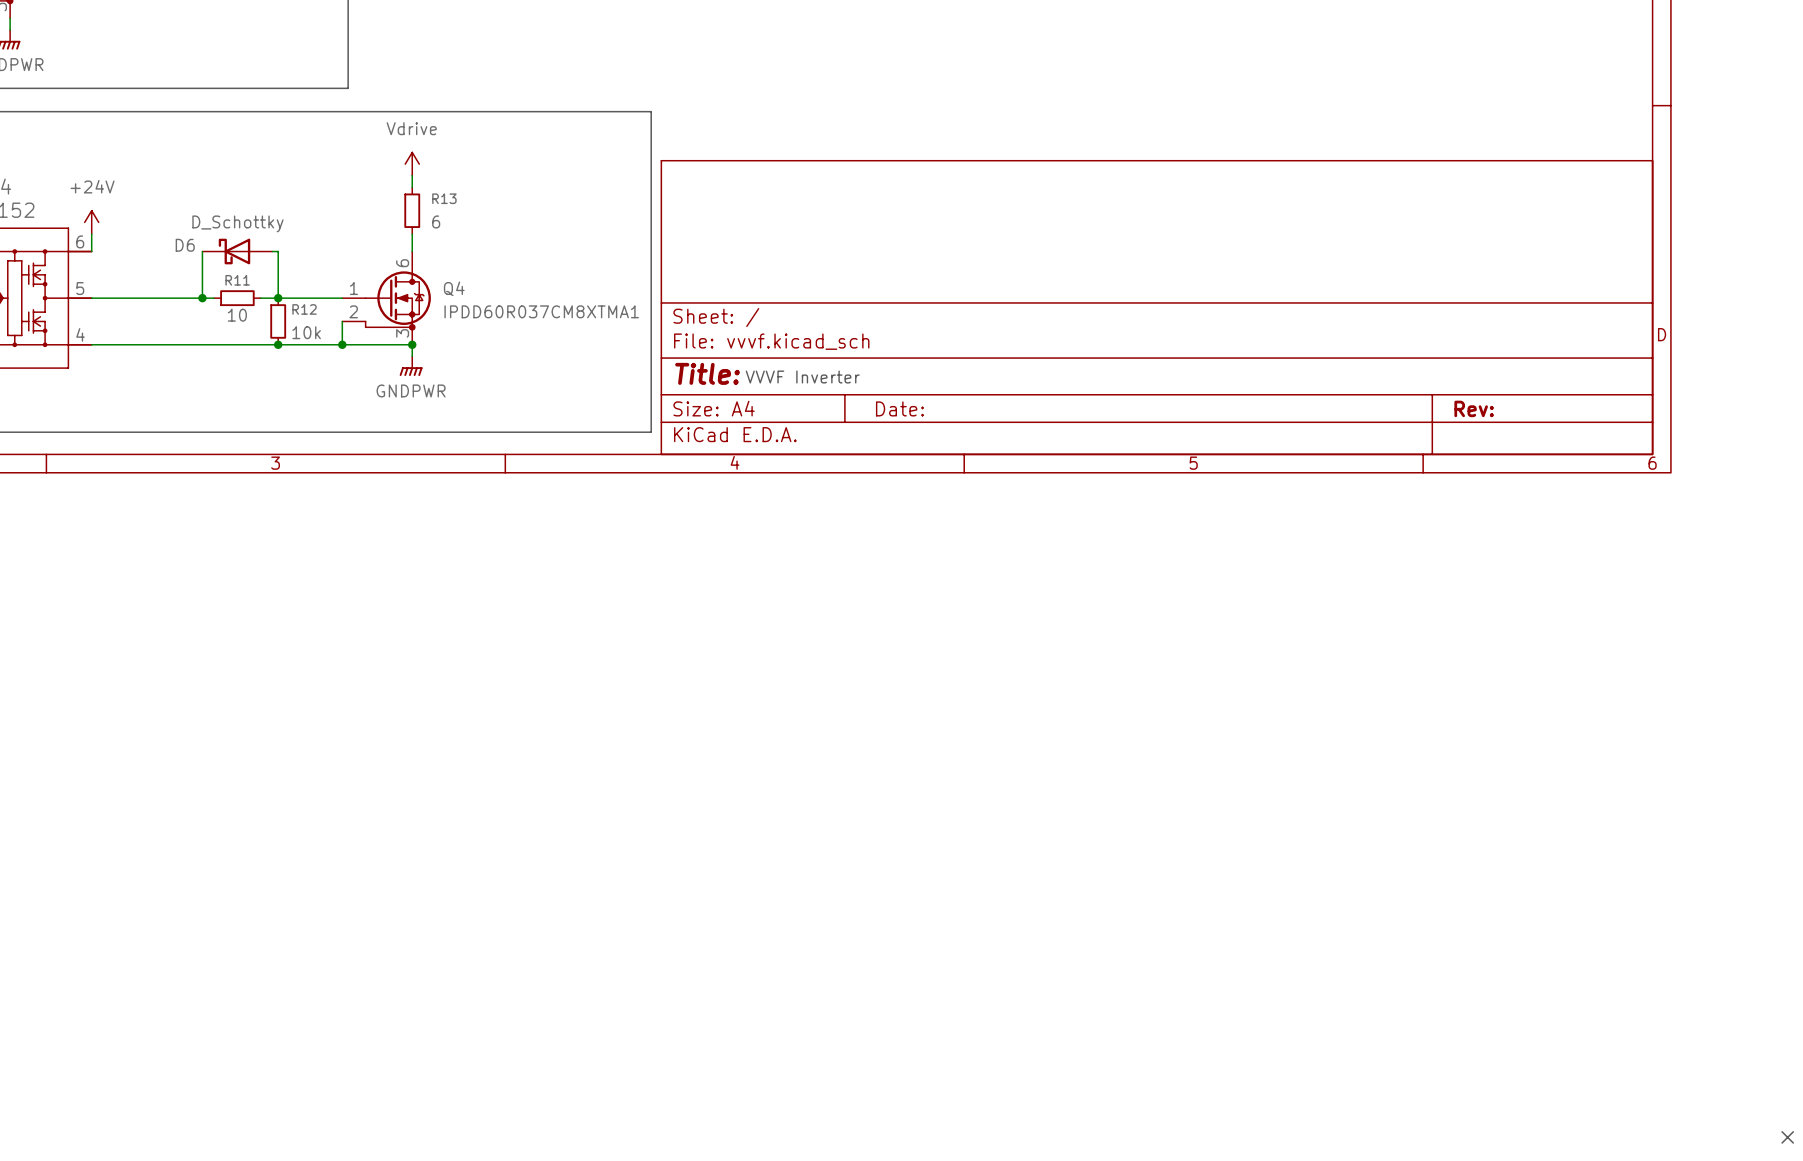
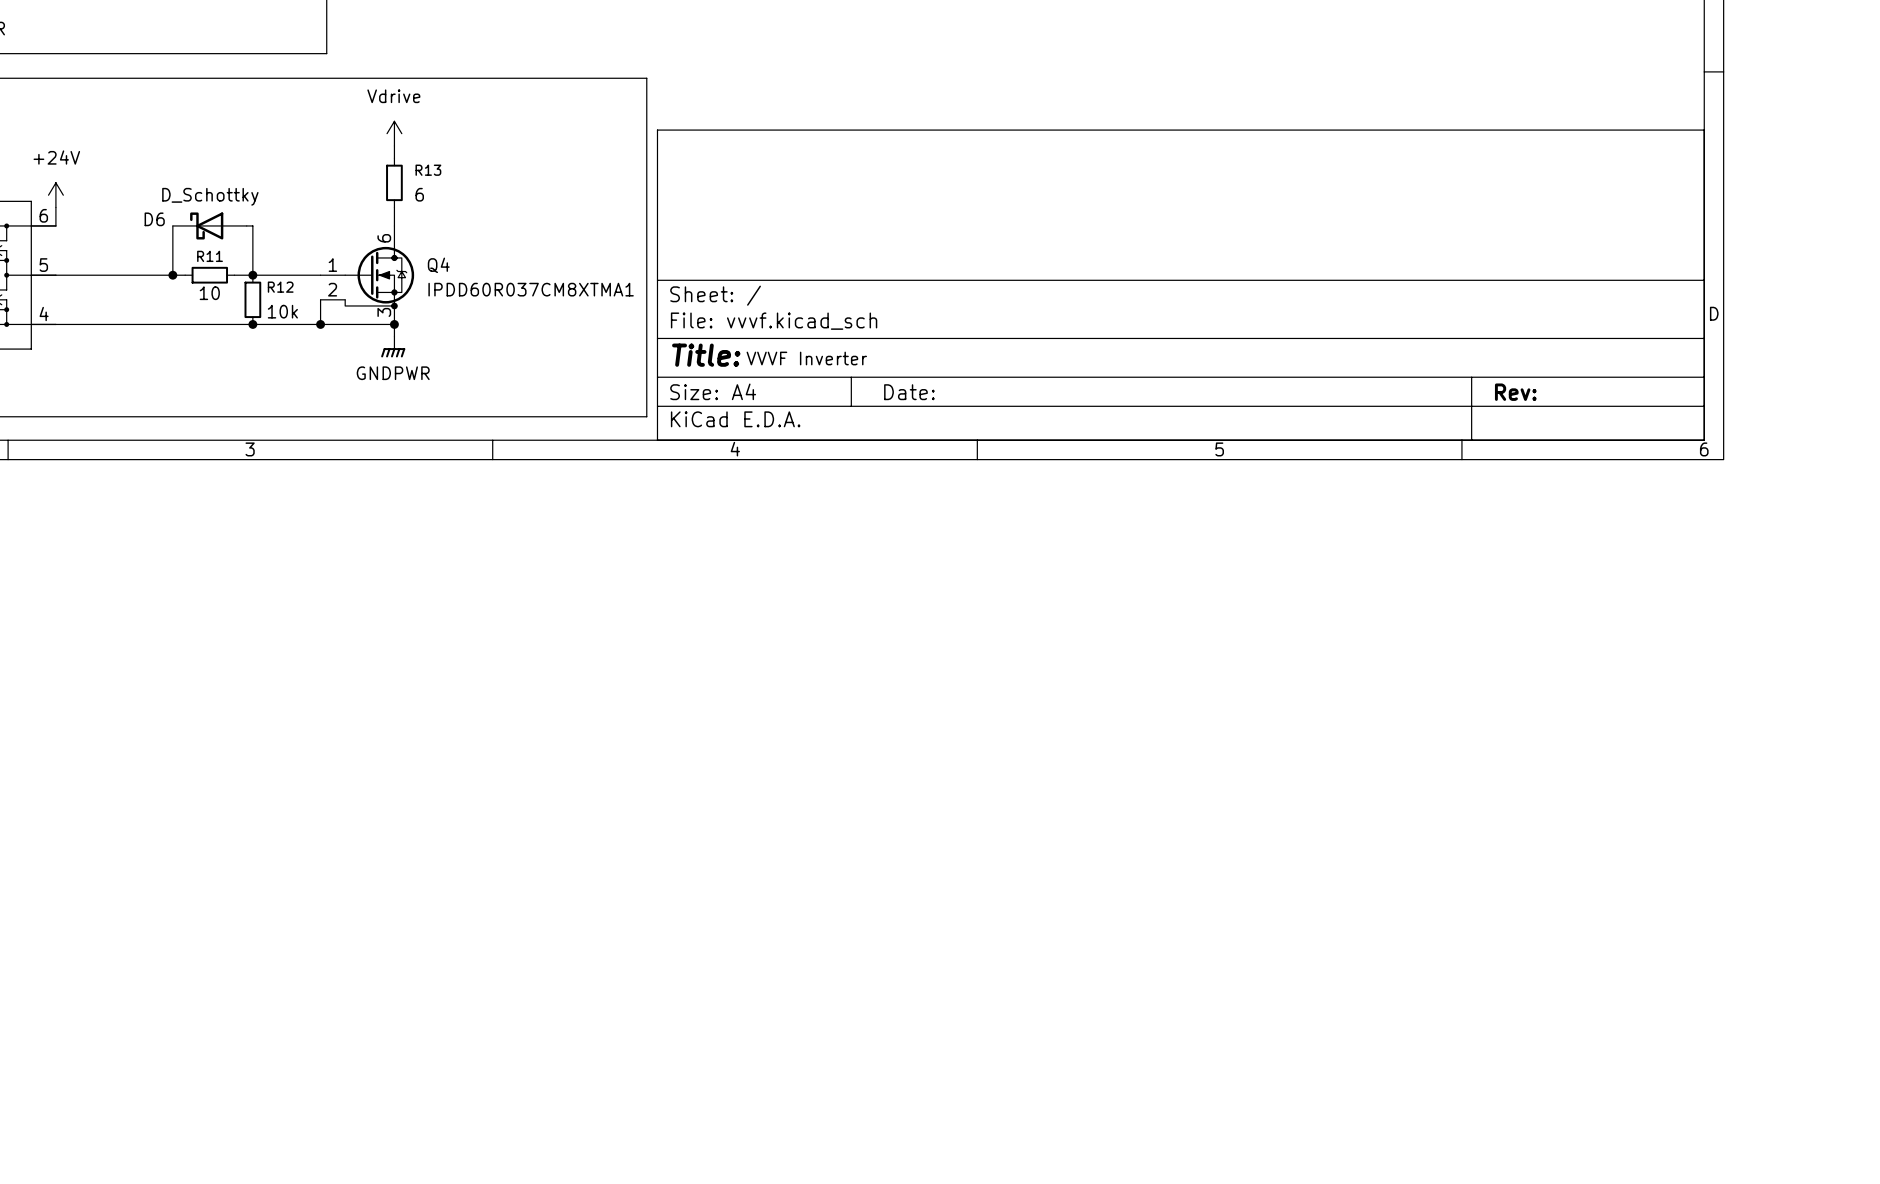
no-connect mark: (1787, 1137) -> none

